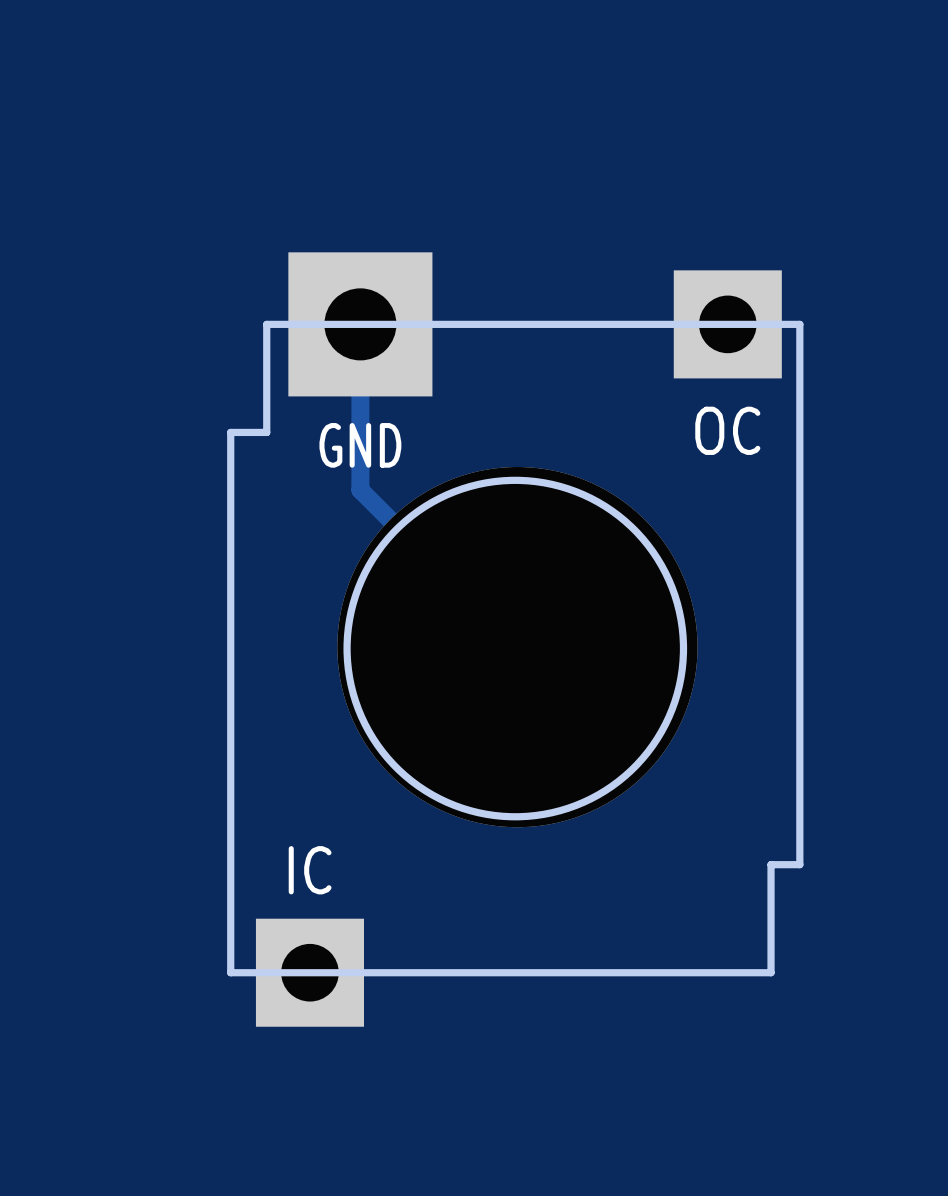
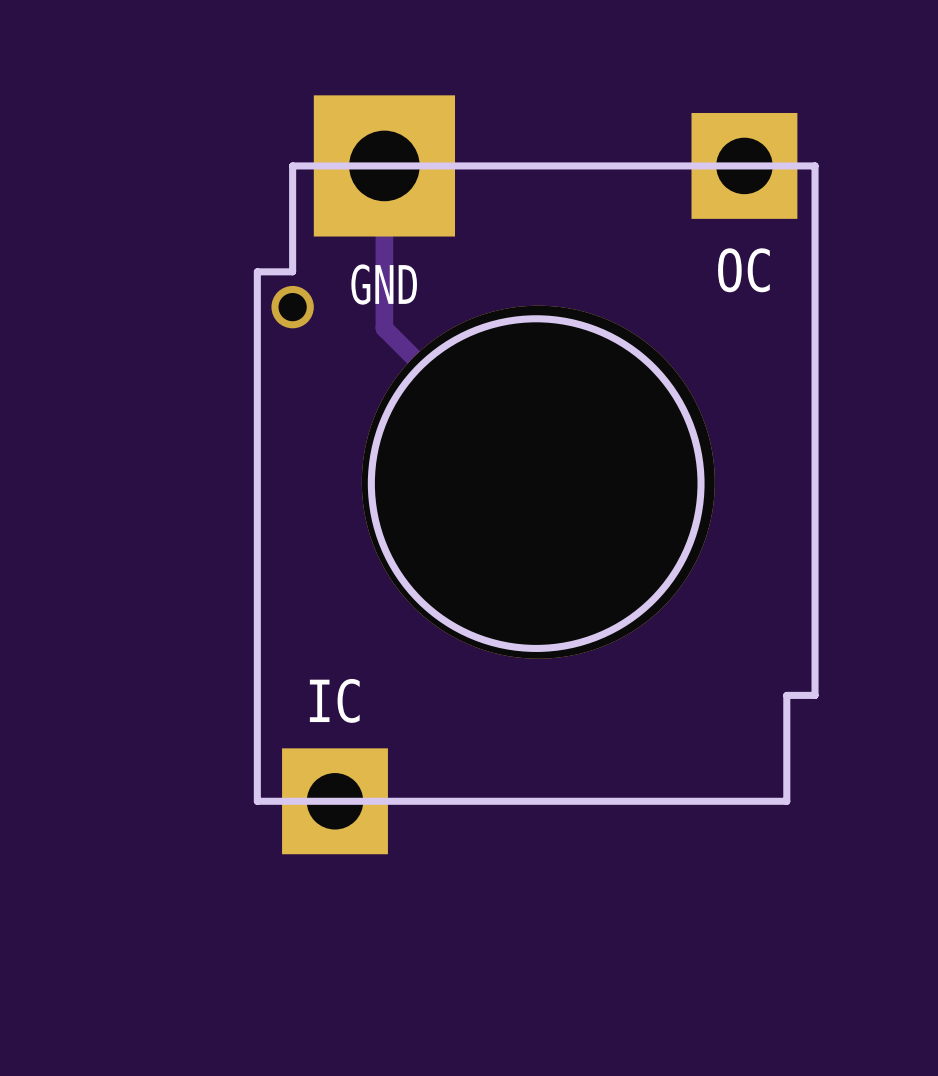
via: none -> (292, 307)

